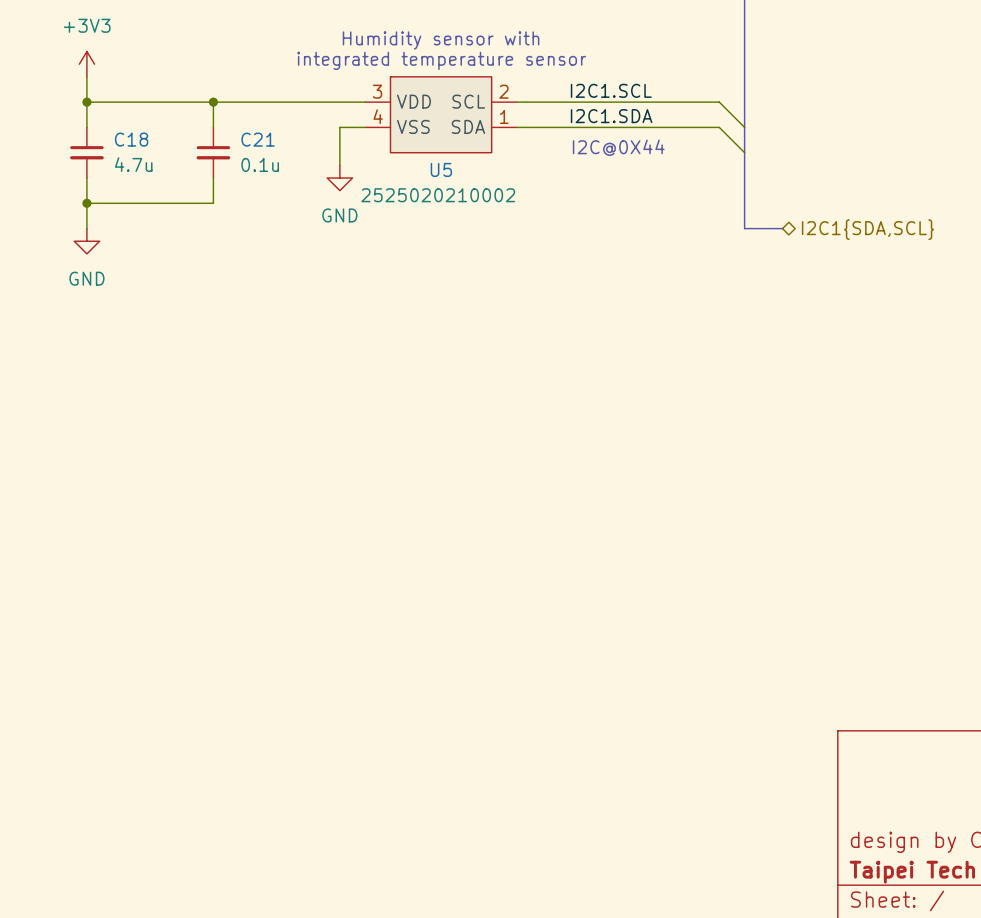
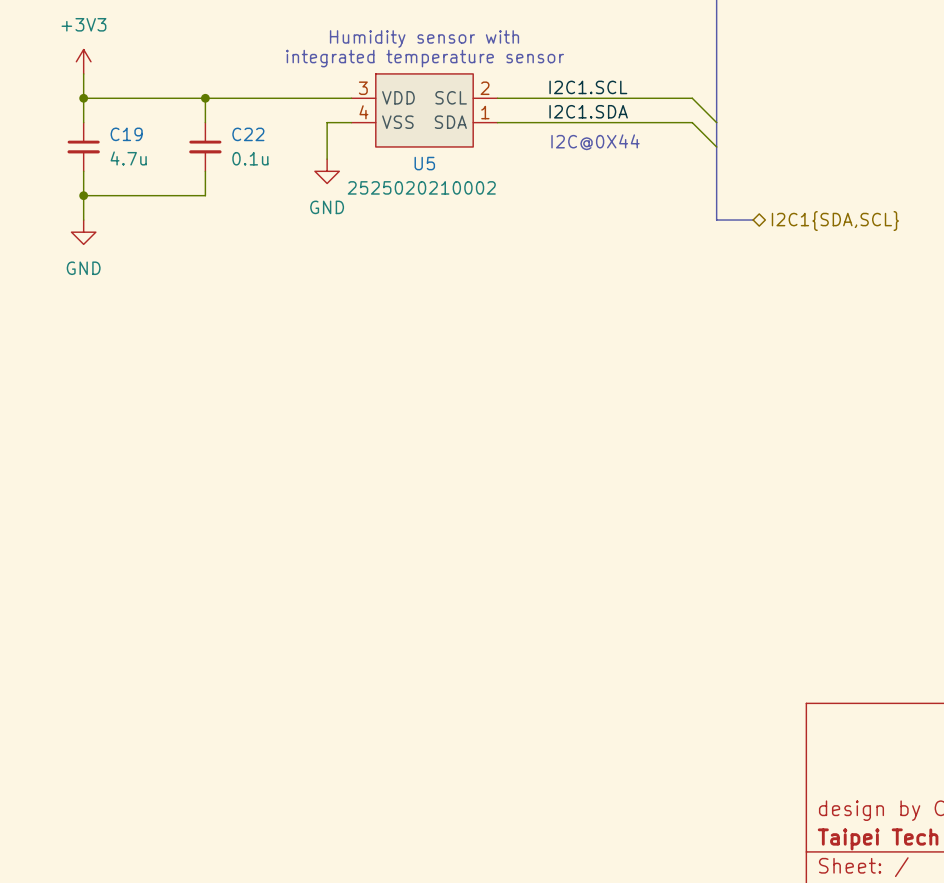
C18 name: C18 (131, 139) -> C19 (126, 134)
C21 name: C21 (258, 139) -> C22 (248, 134)

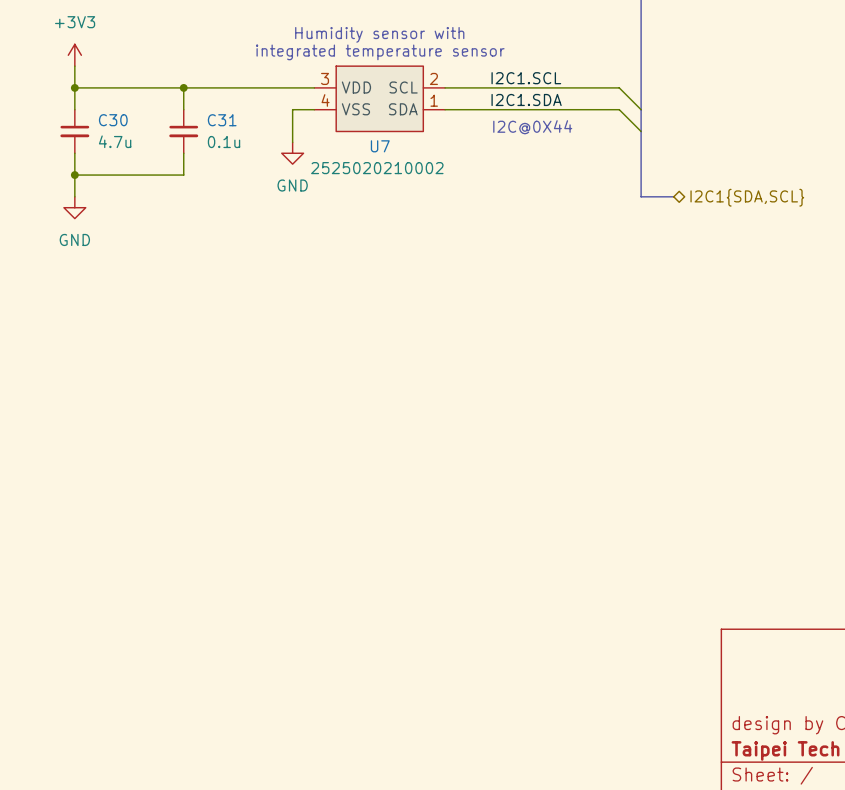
C19 name: C19 (126, 134) -> C30 (113, 120)
C22 name: C22 (248, 134) -> C31 (222, 120)
U5 name: U5 (424, 163) -> U7 (380, 146)

